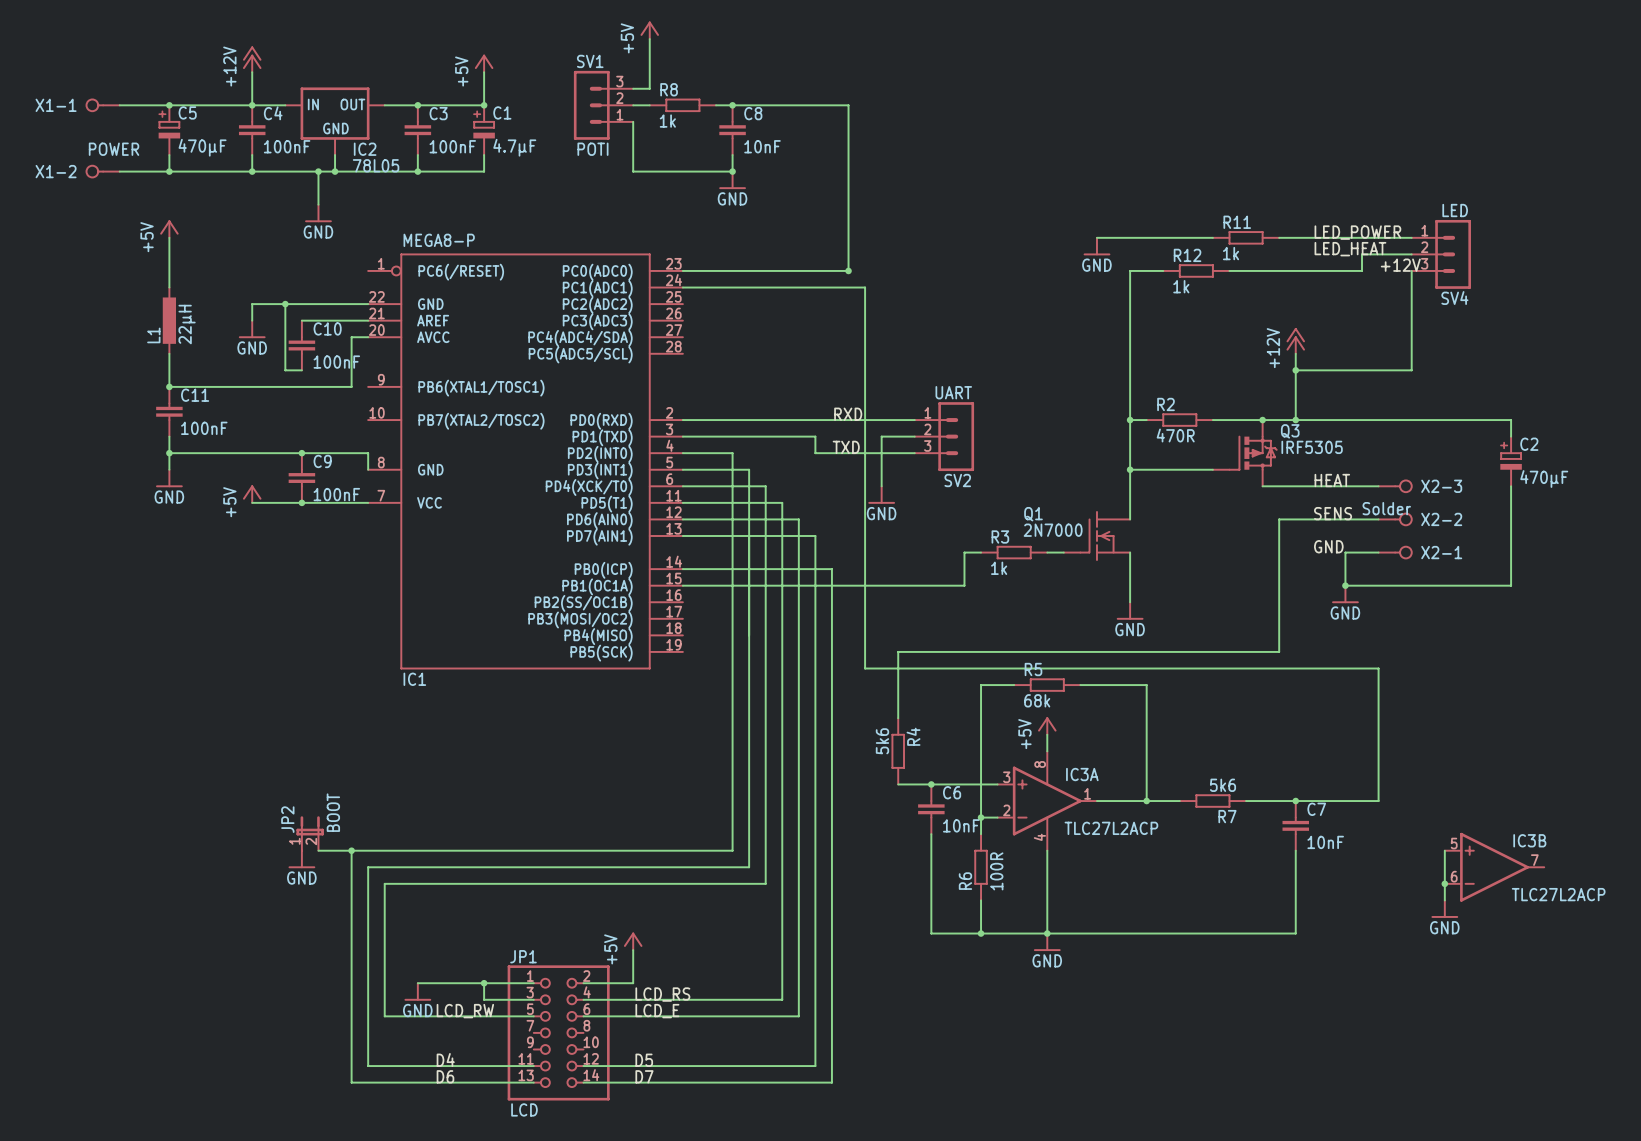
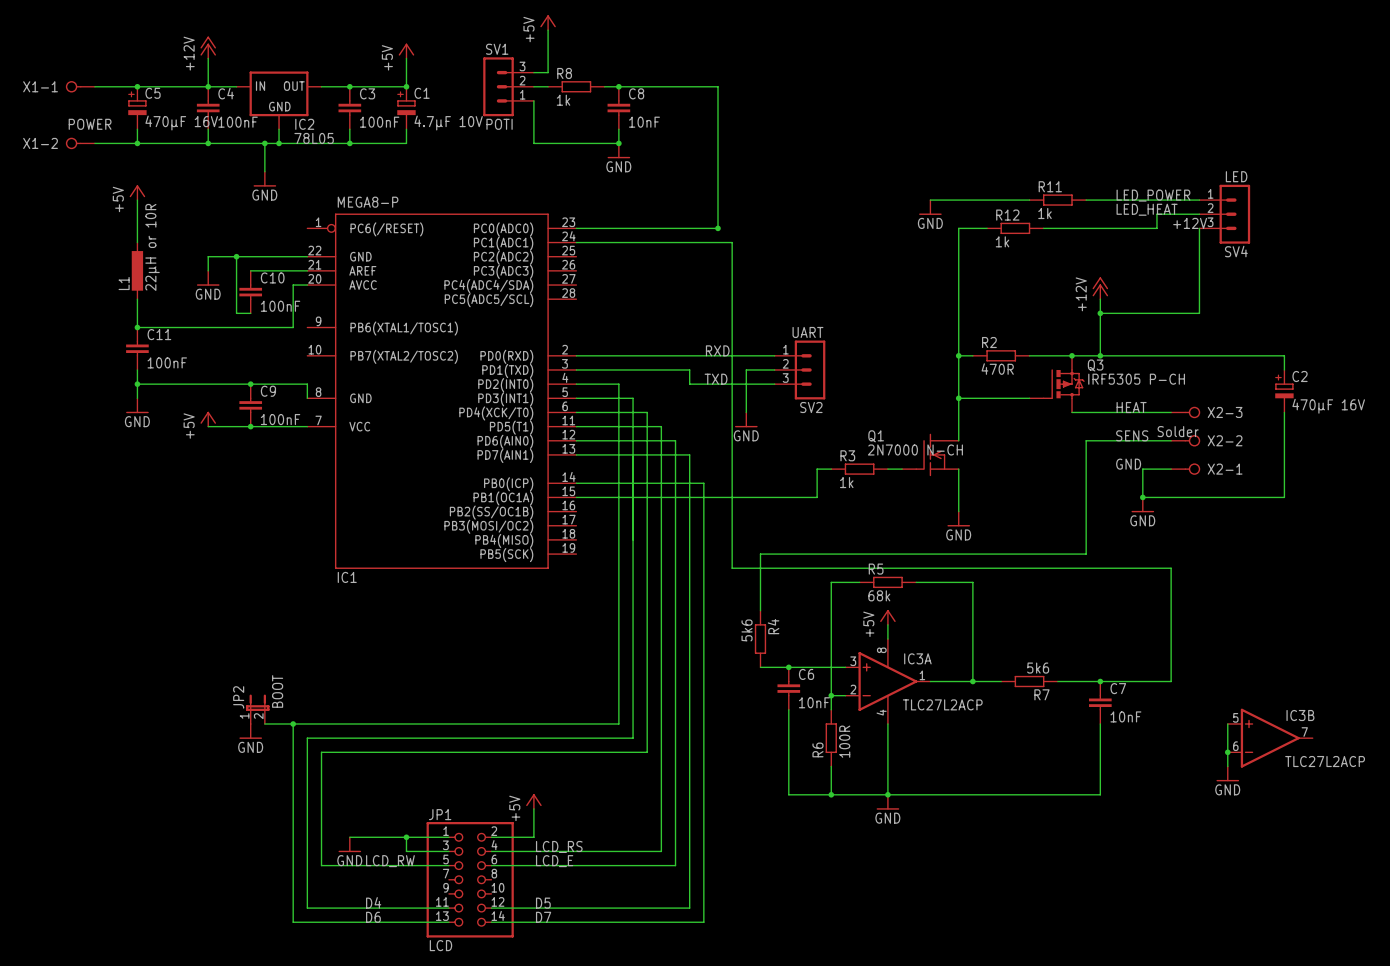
C5 value: 470µF (202, 147) -> 470µF 16V (181, 123)
C1 value: 4.7µF (514, 147) -> 4.7µF 10V (448, 123)
L1 value: 22µH (187, 324) -> 22µH or 10R (152, 247)
Q3 value: IRF5305 (1312, 447) -> IRF5305 P-CH (1136, 379)
C2 value: 470µF (1544, 479) -> 470µF 16V (1328, 406)
Q1 value: 2N7000 (1053, 530) -> 2N7000 N-CH (915, 449)

